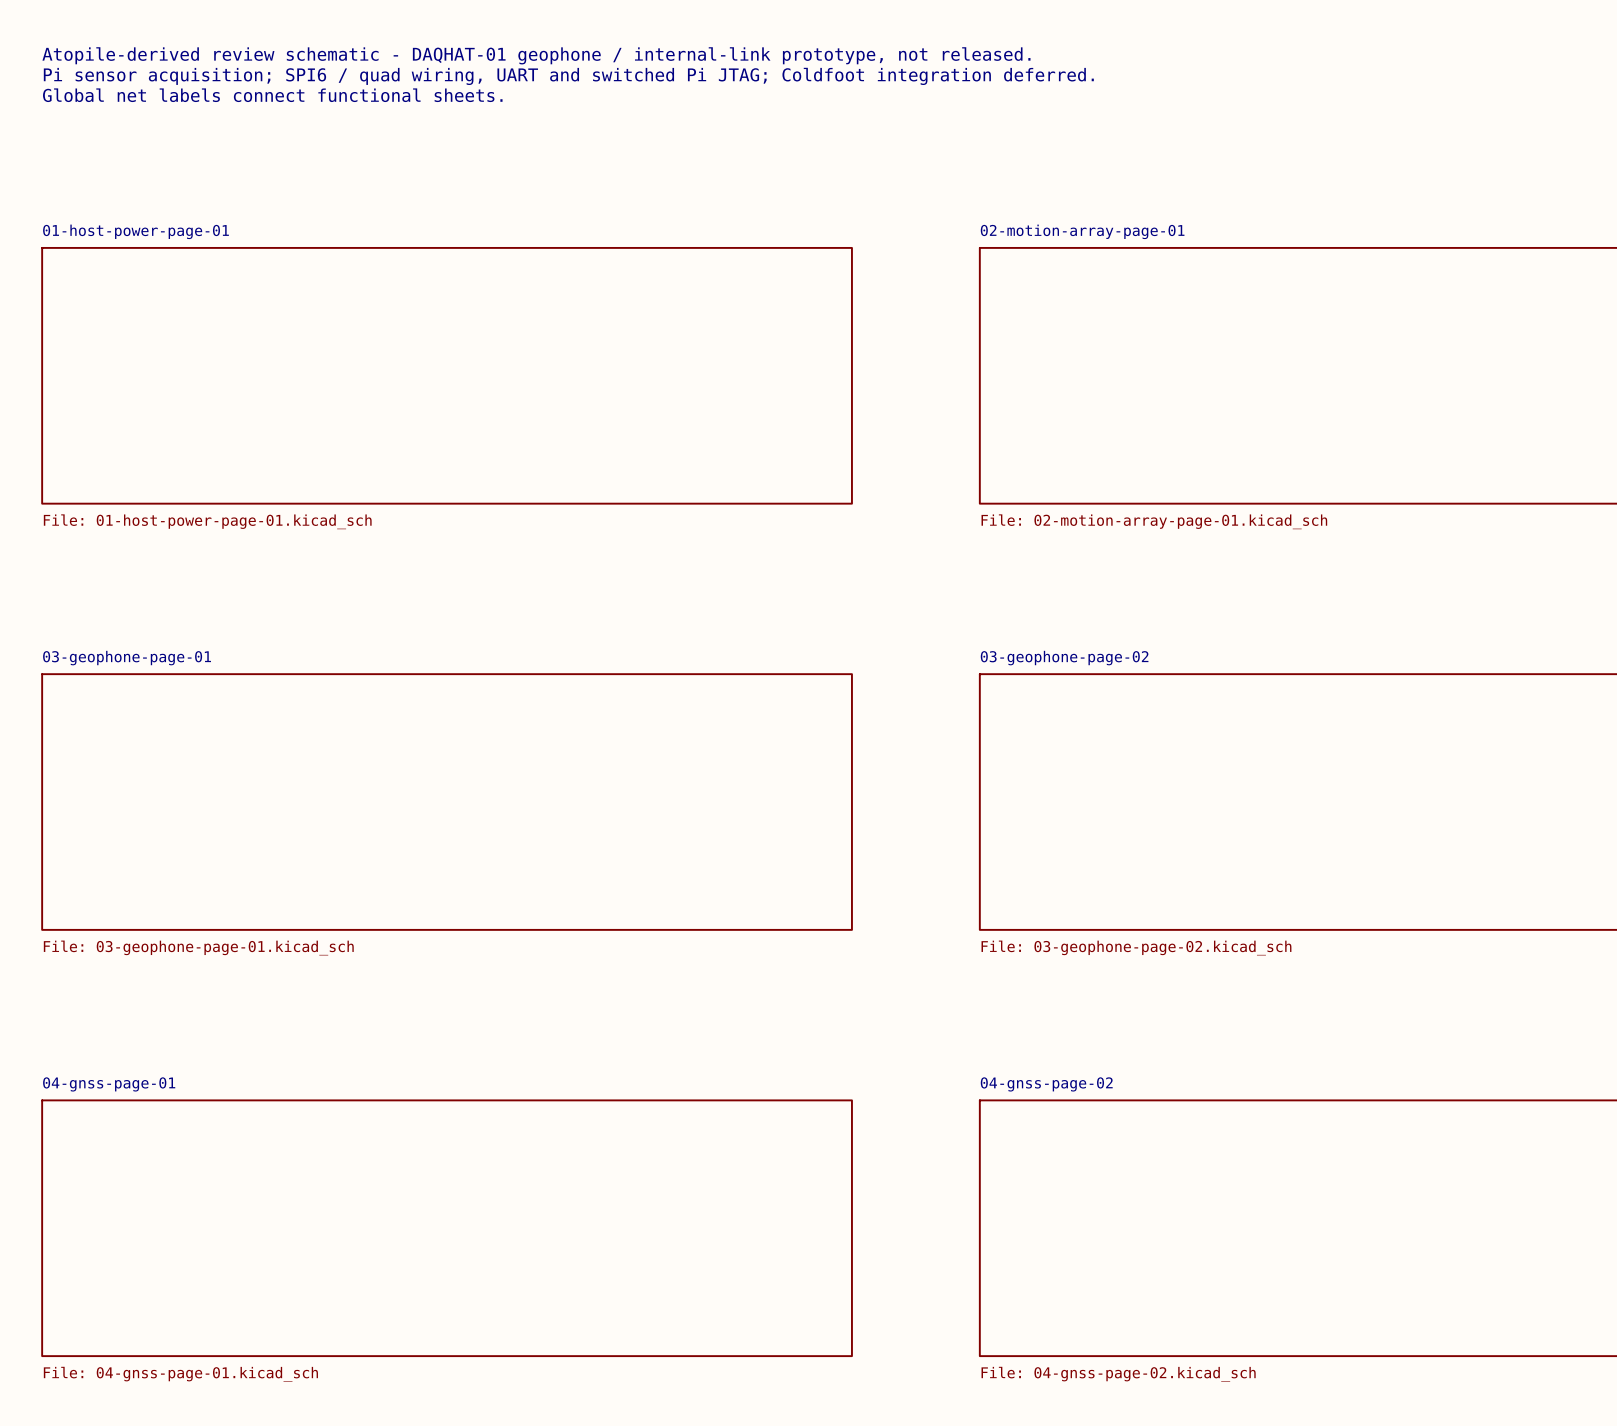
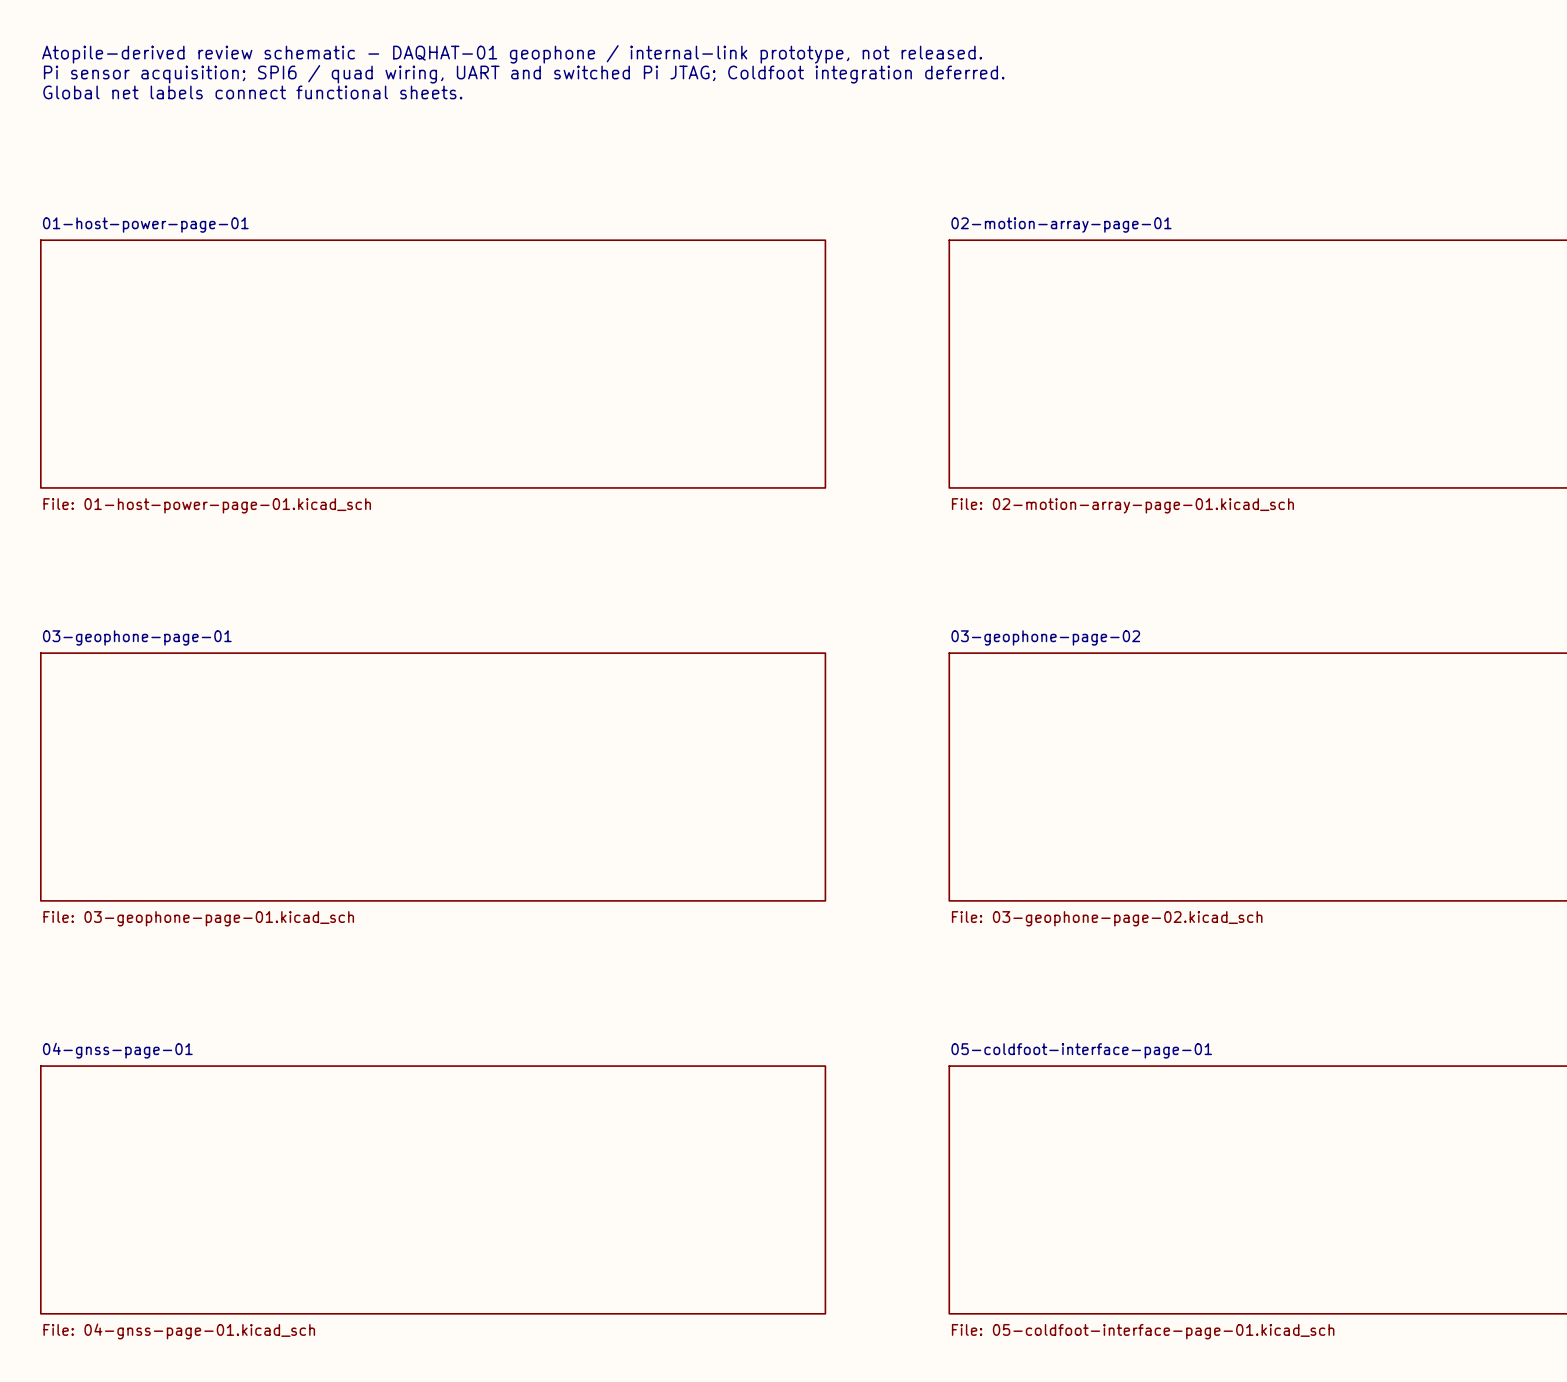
sheet 04-gnss-page-02 name: 04-gnss-page-02 (1046, 1084) -> 05-coldfoot-interface-page-01 (1081, 1050)
sheet 04-gnss-page-02 value: File: 04-gnss-page-02.kicad_sch (1118, 1374) -> File: 05-coldfoot-interface-page-01.kicad_sch (1143, 1331)

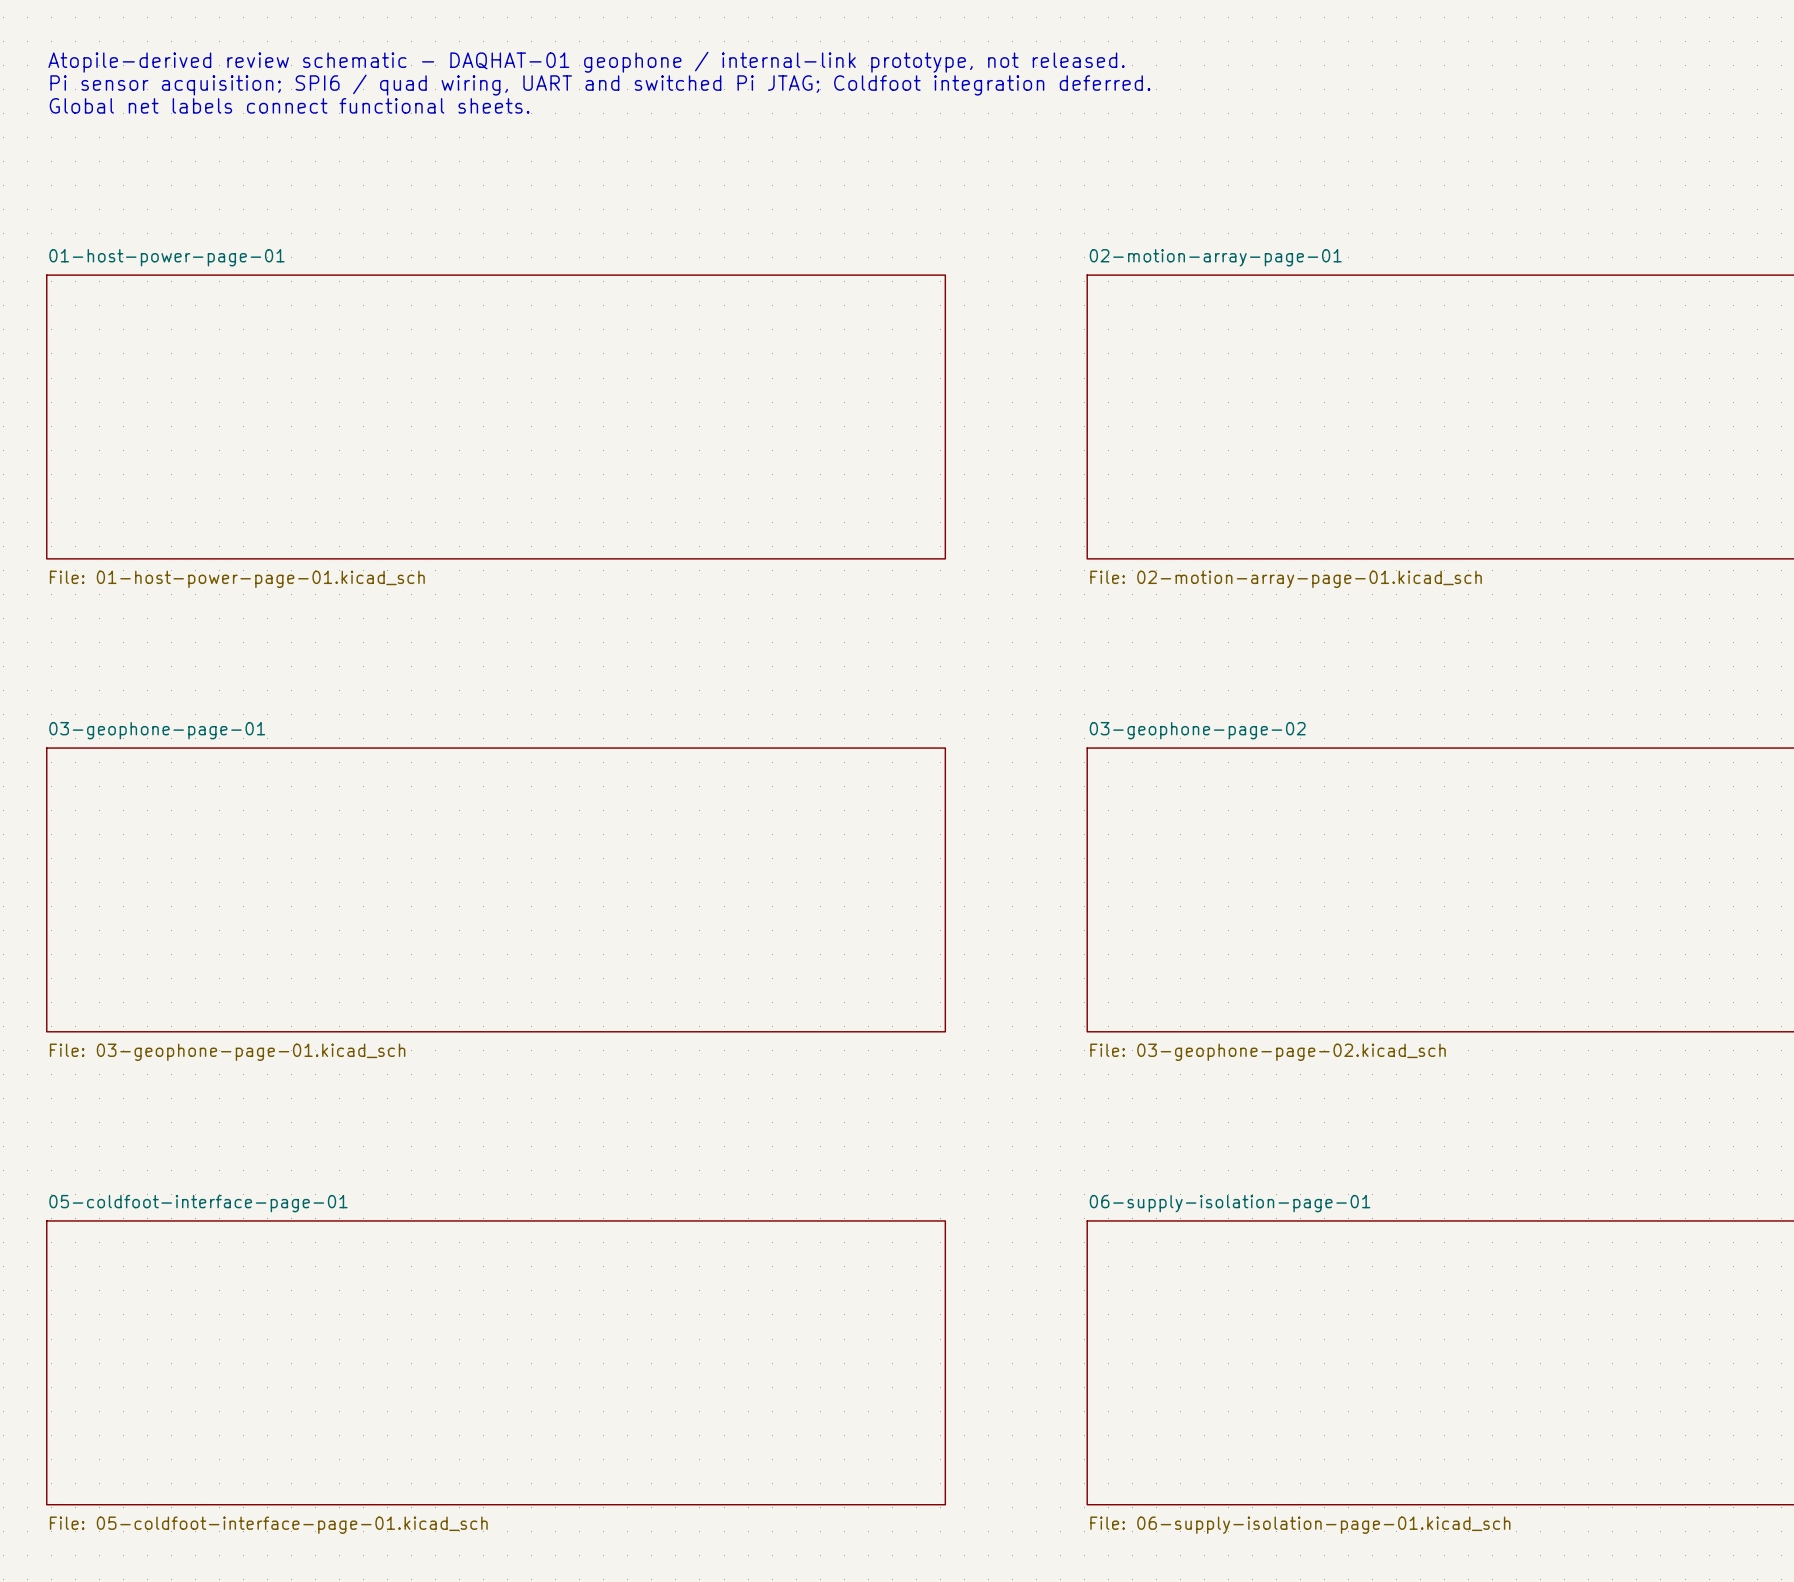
sheet 04-gnss-page-01 name: 04-gnss-page-01 (117, 1050) -> 05-coldfoot-interface-page-01 (198, 1203)
sheet 05-coldfoot-interface-page-01 name: 05-coldfoot-interface-page-01 (1081, 1050) -> 06-supply-isolation-page-01 (1230, 1203)
sheet 04-gnss-page-01 value: File: 04-gnss-page-01.kicad_sch (179, 1331) -> File: 05-coldfoot-interface-page-01.kicad_sch (268, 1525)
sheet 05-coldfoot-interface-page-01 value: File: 05-coldfoot-interface-page-01.kicad_sch (1143, 1331) -> File: 06-supply-isolation-page-01.kicad_sch (1300, 1525)

